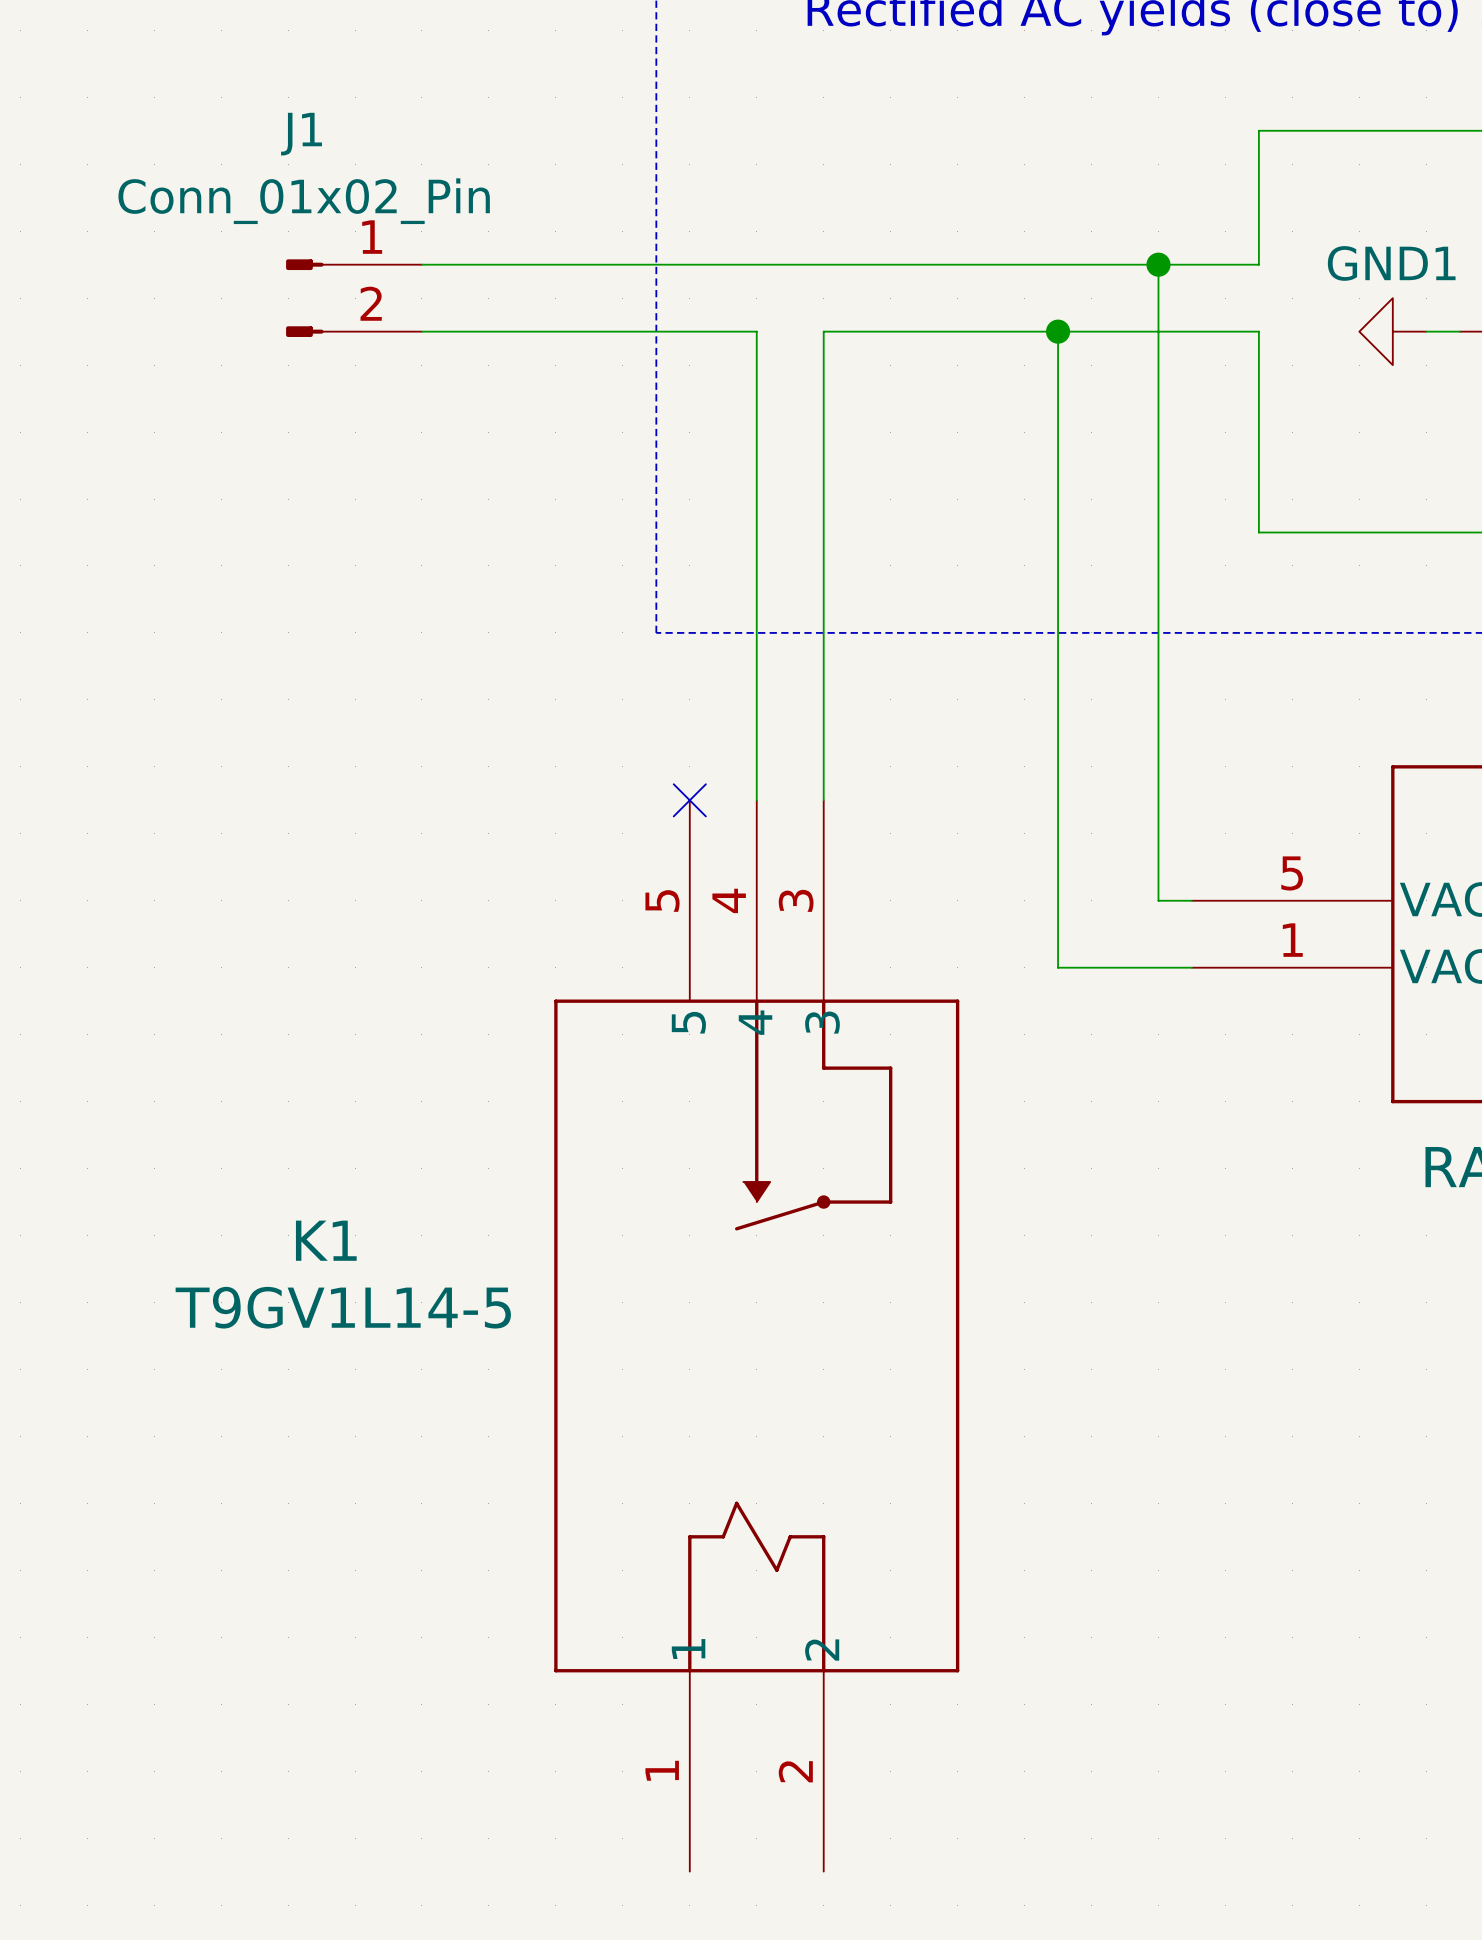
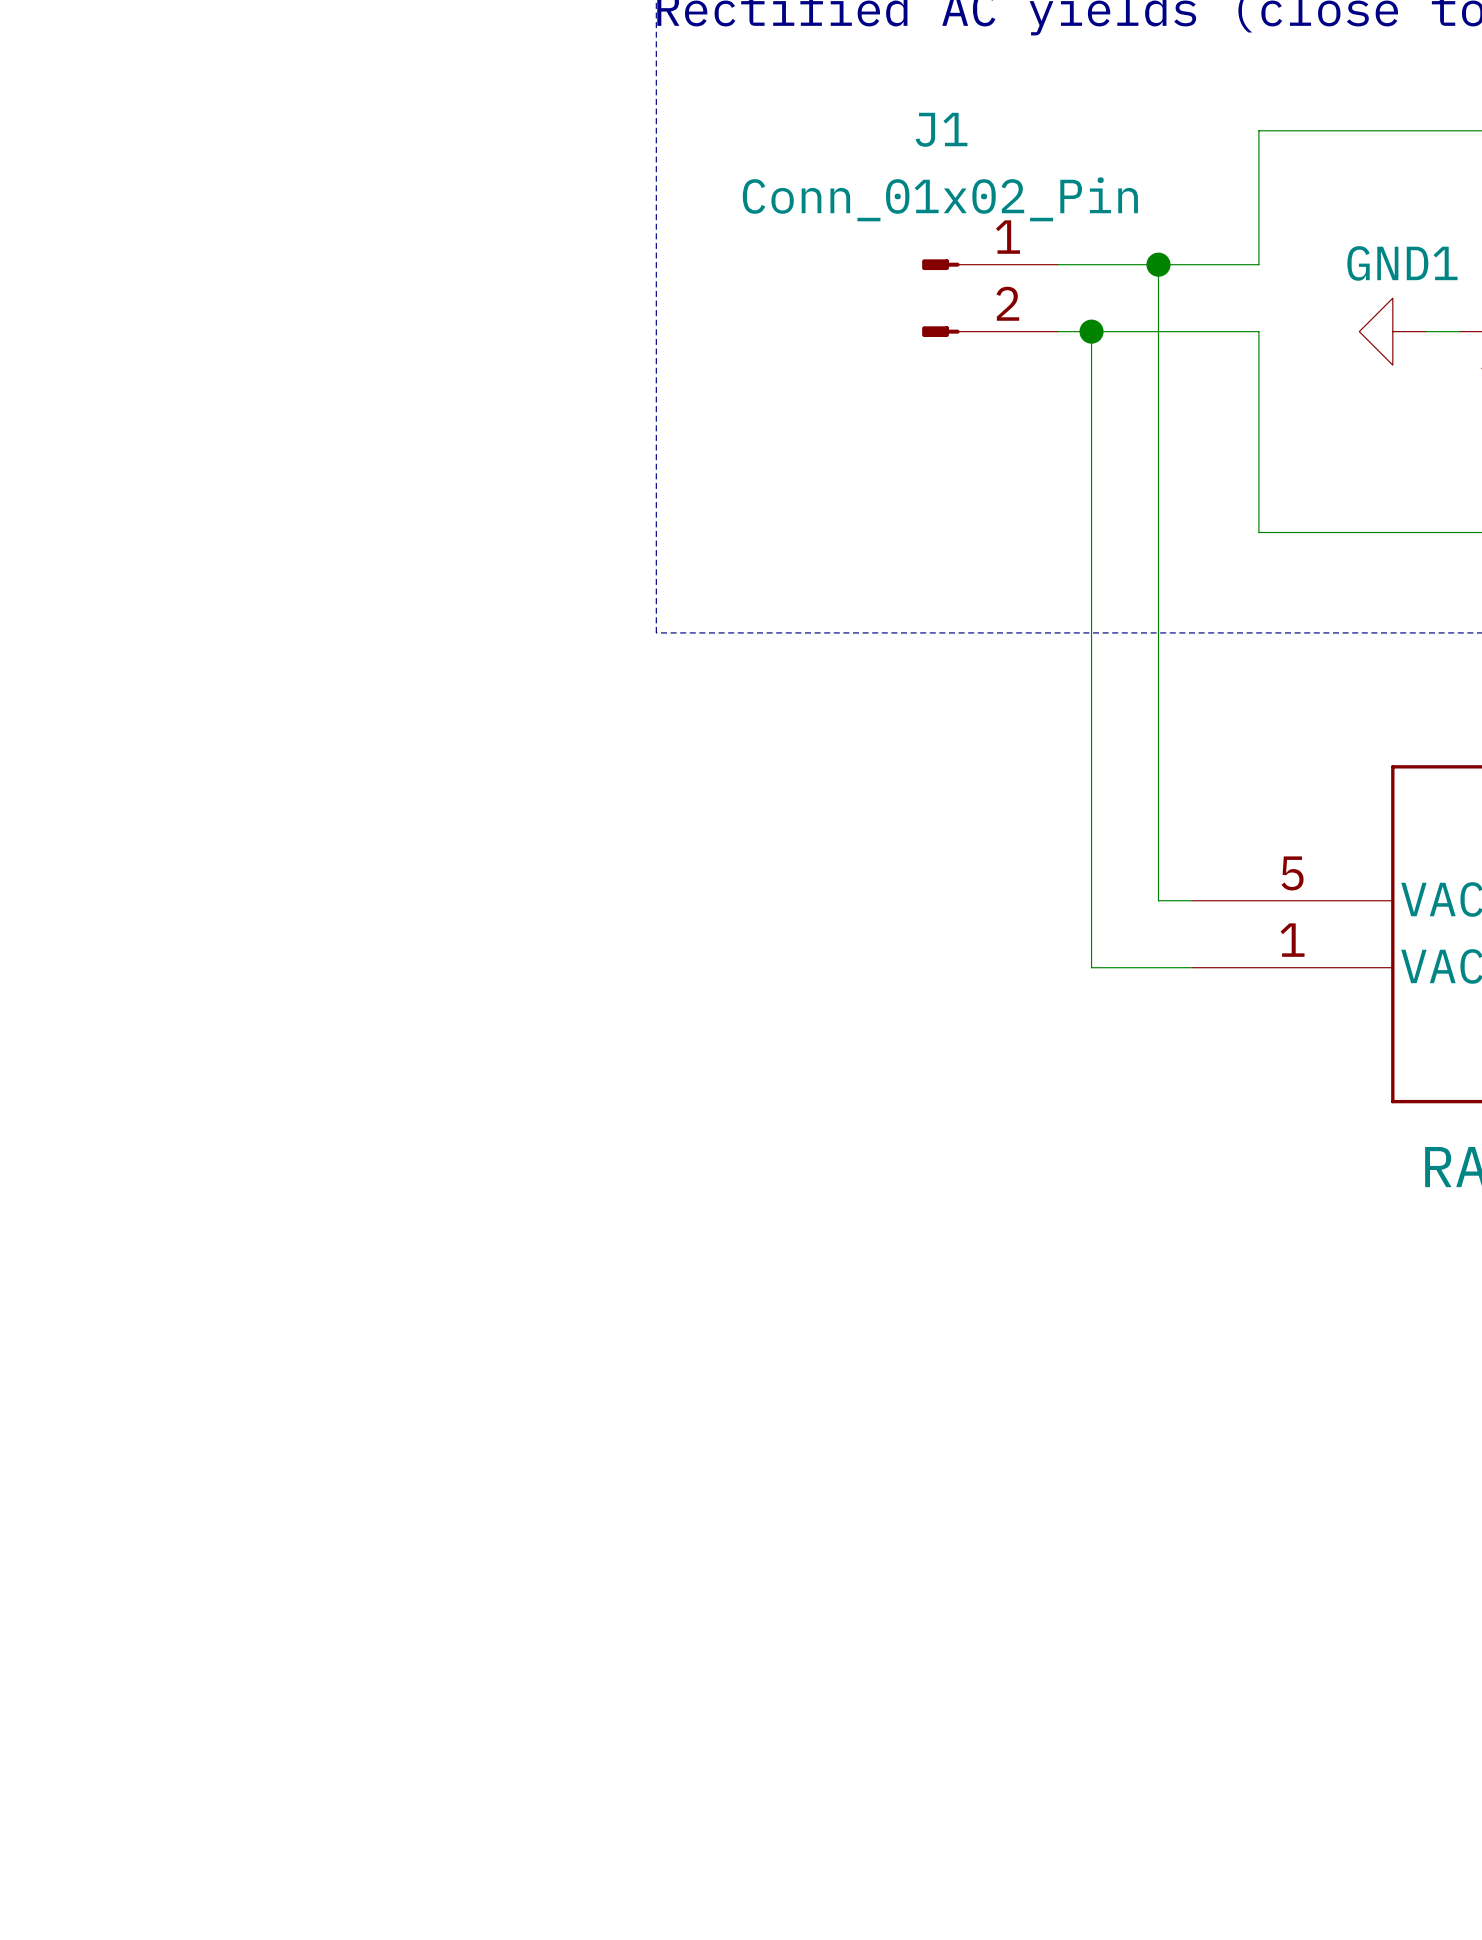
wire: (421, 264) (1058, 264) -> none
J1 position: (354, 298) -> (990, 298)
wire: (421, 331) (756, 331) (756, 800) -> none
junction position: (1058, 331) -> (1091, 331)
no-connect mark: (689, 800) -> none
wire: (823, 800) (823, 331) (1058, 331) (1058, 967) (1091, 967) -> (1091, 331) (1091, 967)
K1: T9GV1L14-5 (756, 1335) -> none

